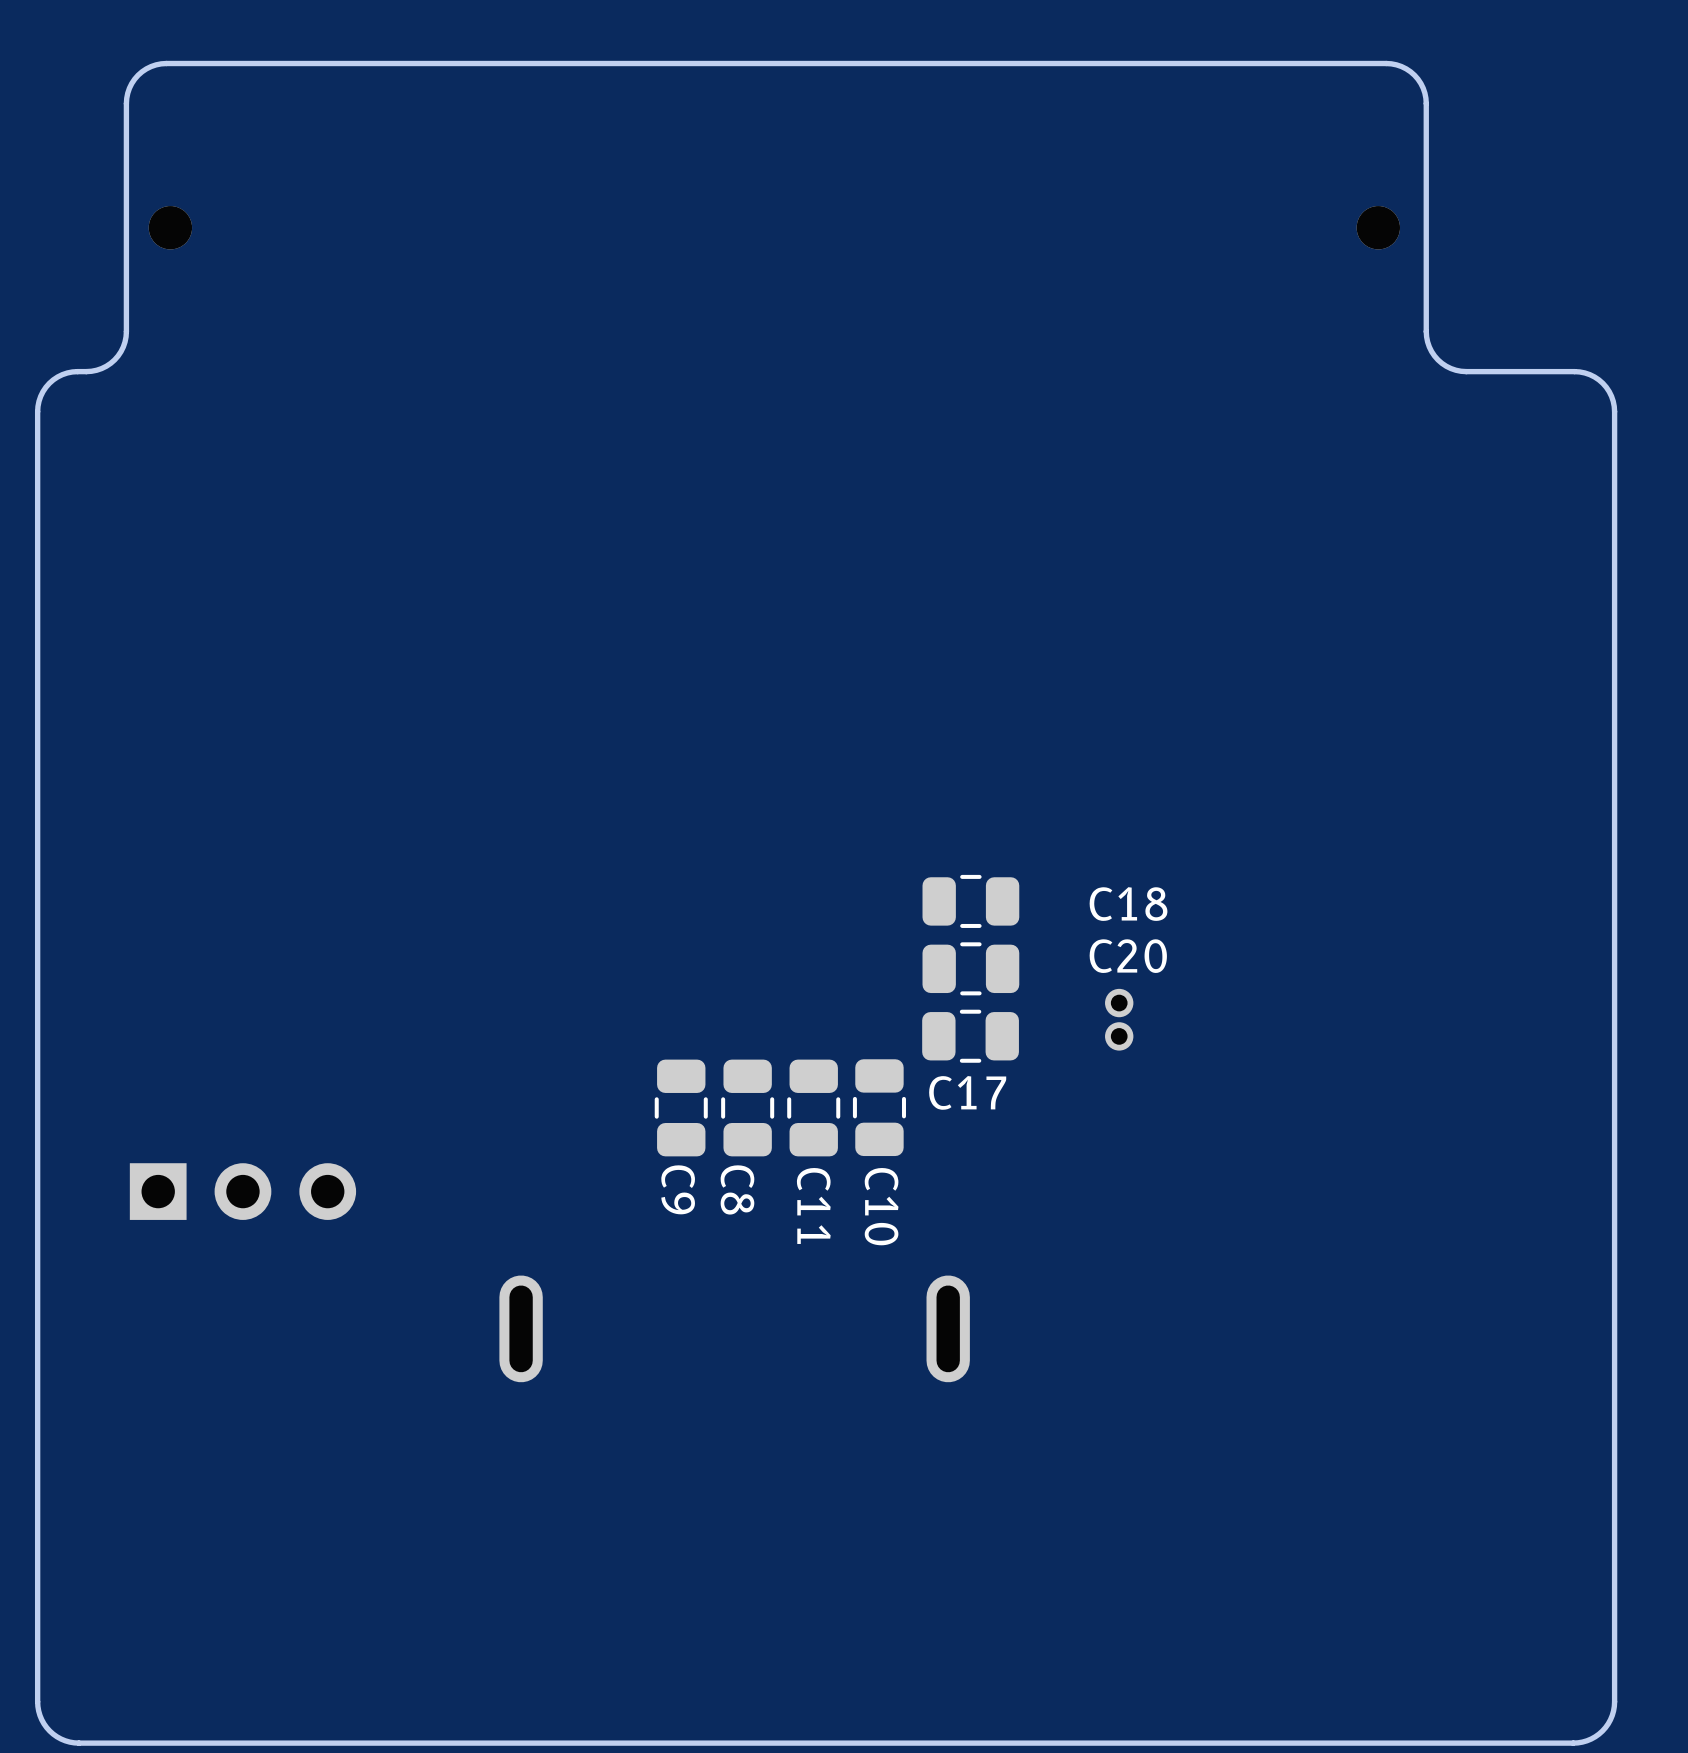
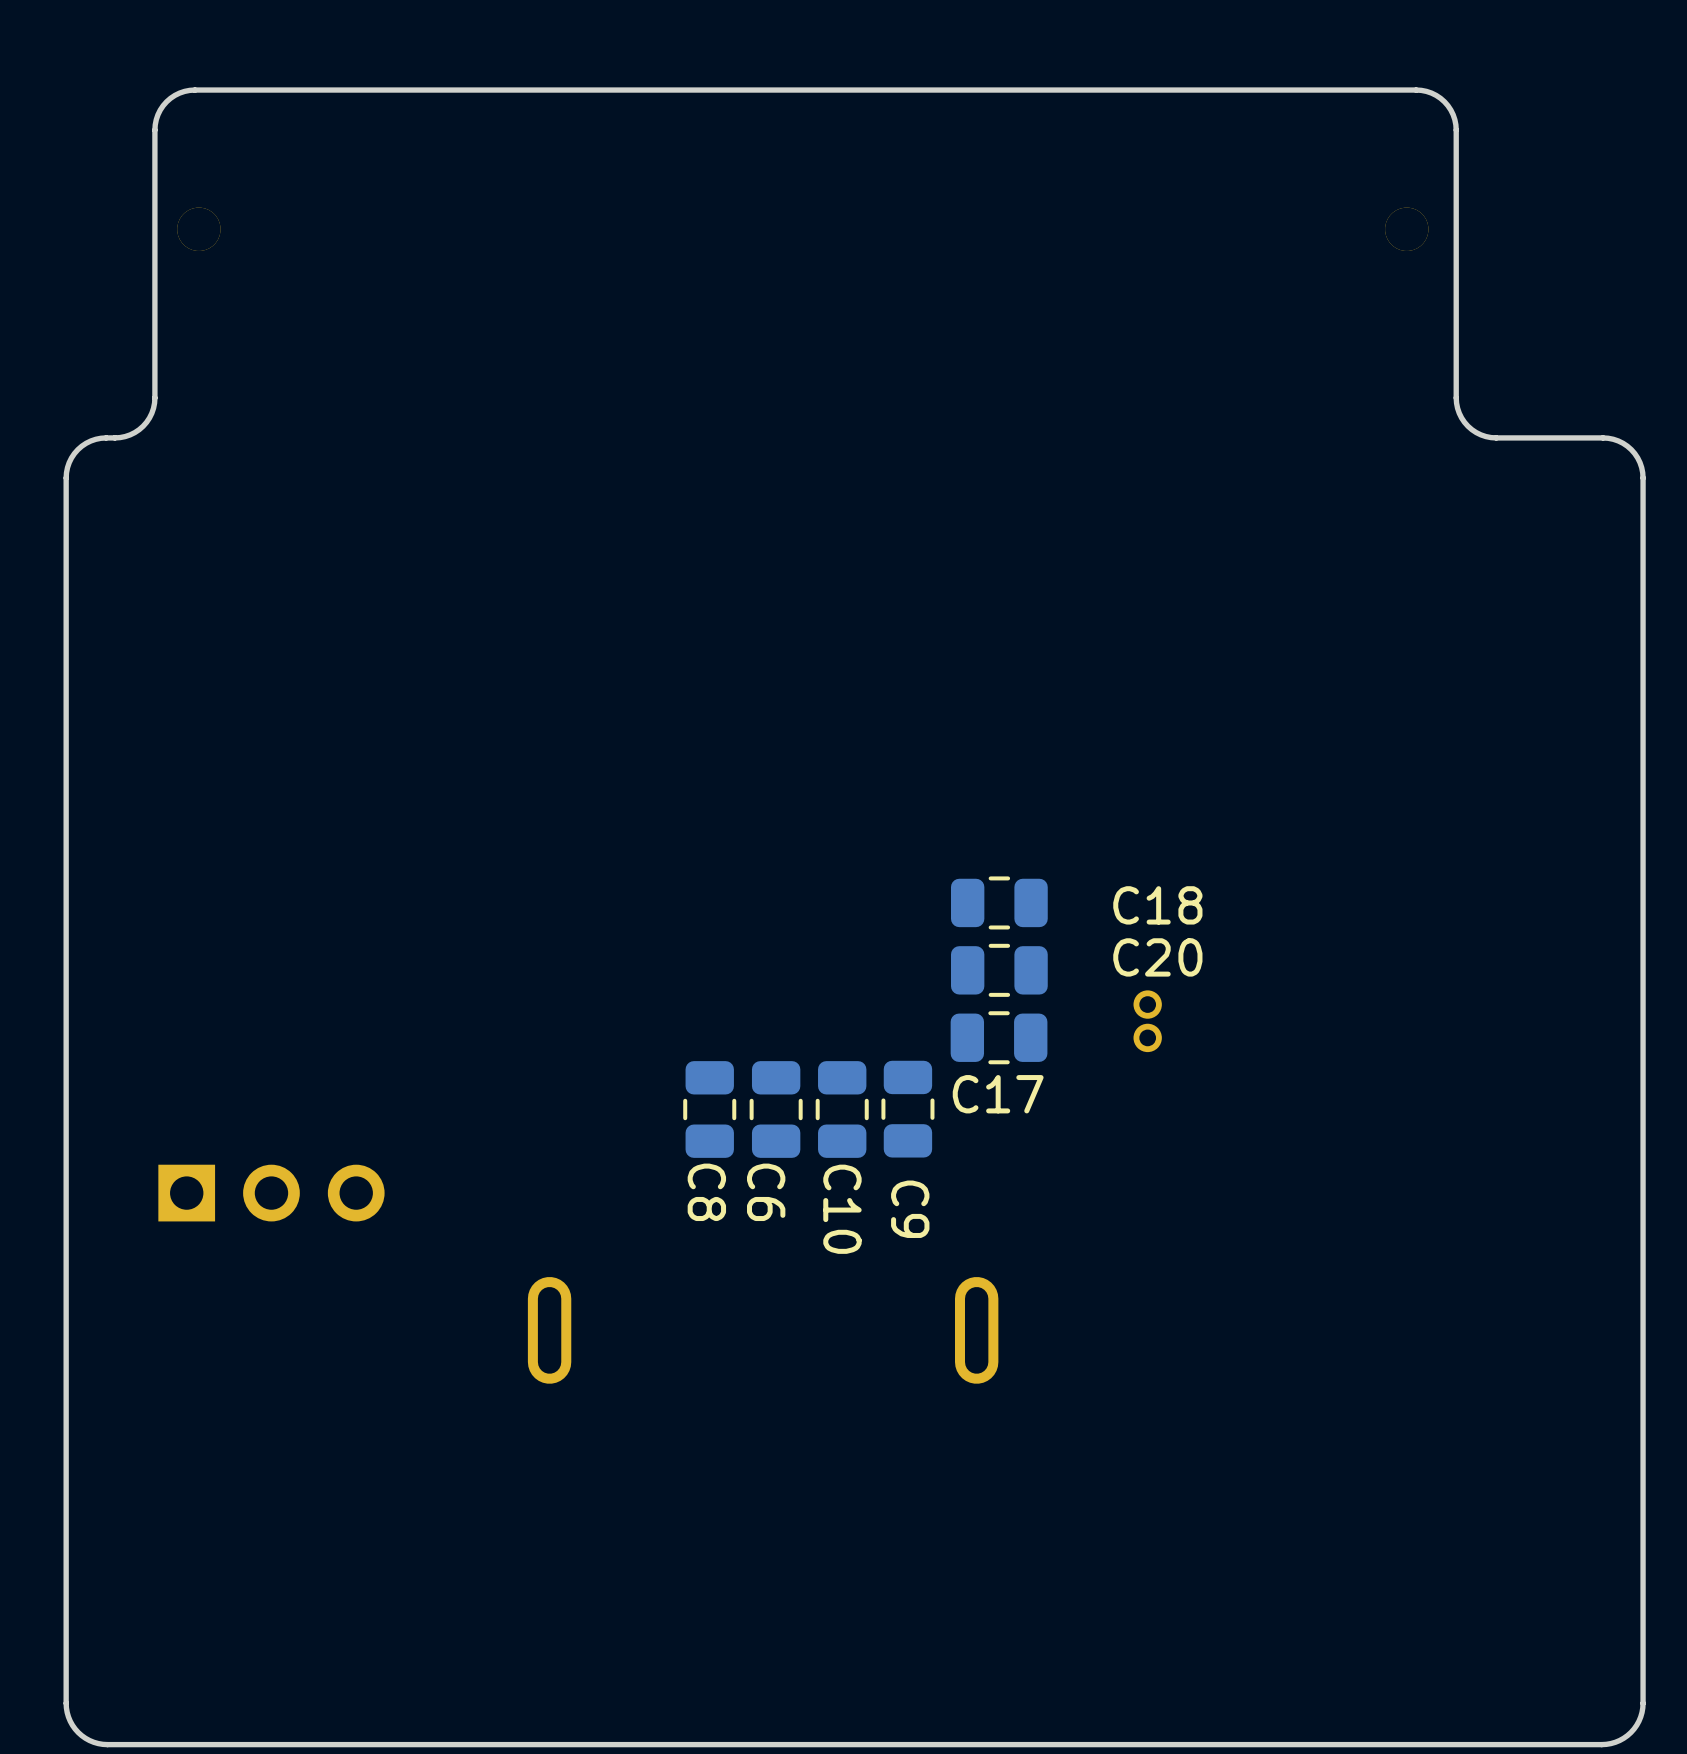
board edge: (126, 128) (126, 98) (131, 83) (146, 68) (166, 63) (1396, 64) (1414, 75) (1420, 83) (1425, 98) (1426, 331) (1431, 351) (1441, 363) (1461, 371) (1574, 371) (1589, 374) (1598, 379) (1609, 391) (1614, 406) (1614, 476) -> (154, 130) (157, 114) (166, 101) (179, 93) (194, 90) (1426, 91) (1440, 98) (1447, 105) (1455, 124) (1456, 397) (1461, 417) (1471, 429) (1491, 437) (1613, 439) (1623, 443) (1634, 453) (1641, 467) (1643, 477)
board edge: (126, 331) (121, 351) (110, 363) (96, 370) (62, 374) (49, 383) (43, 391) (37, 411) (37, 476) -> (154, 333) (154, 397) (149, 417) (139, 429) (130, 434) (95, 439) (81, 446) (71, 457) (66, 477)
C9 name: C9 (678, 1189) -> C8 (706, 1192)
C8 name: C8 (737, 1189) -> C6 (766, 1192)
C11 name: C11 (813, 1205) -> C10 (842, 1209)
C10 name: C10 (881, 1206) -> C9 (910, 1209)

